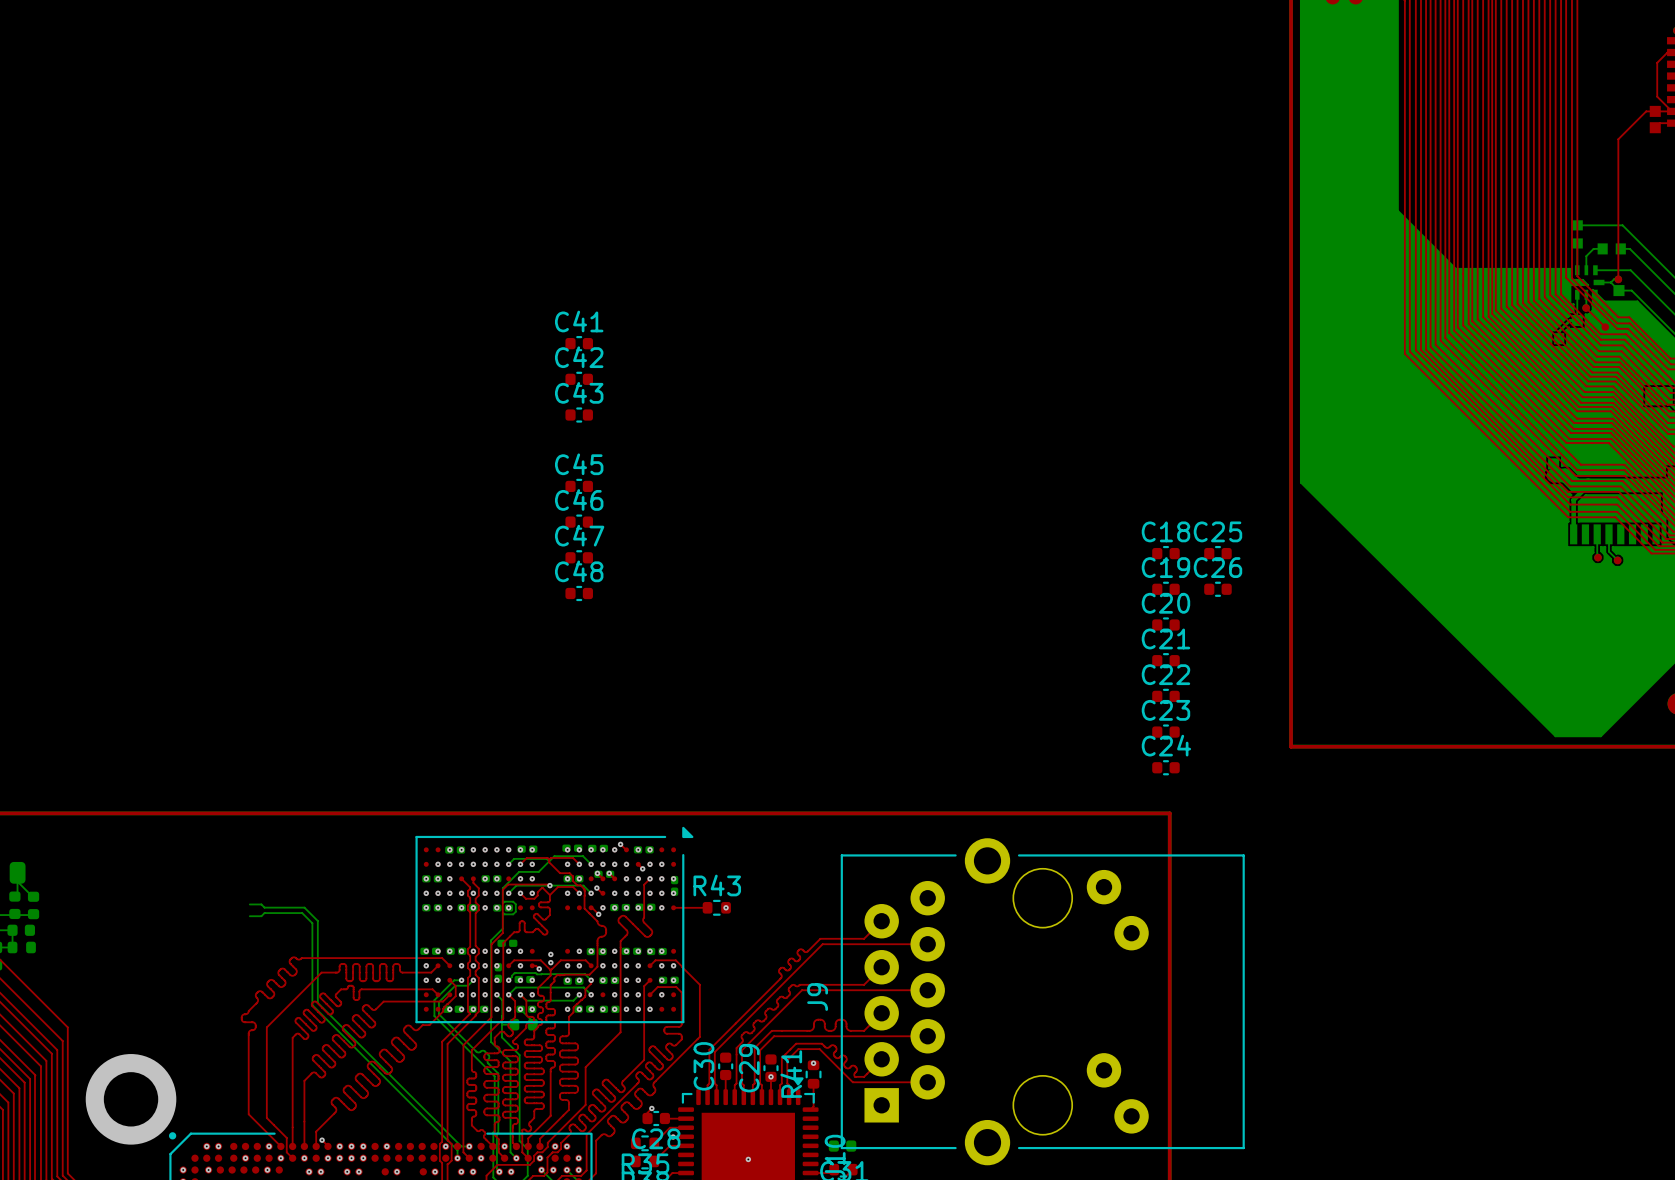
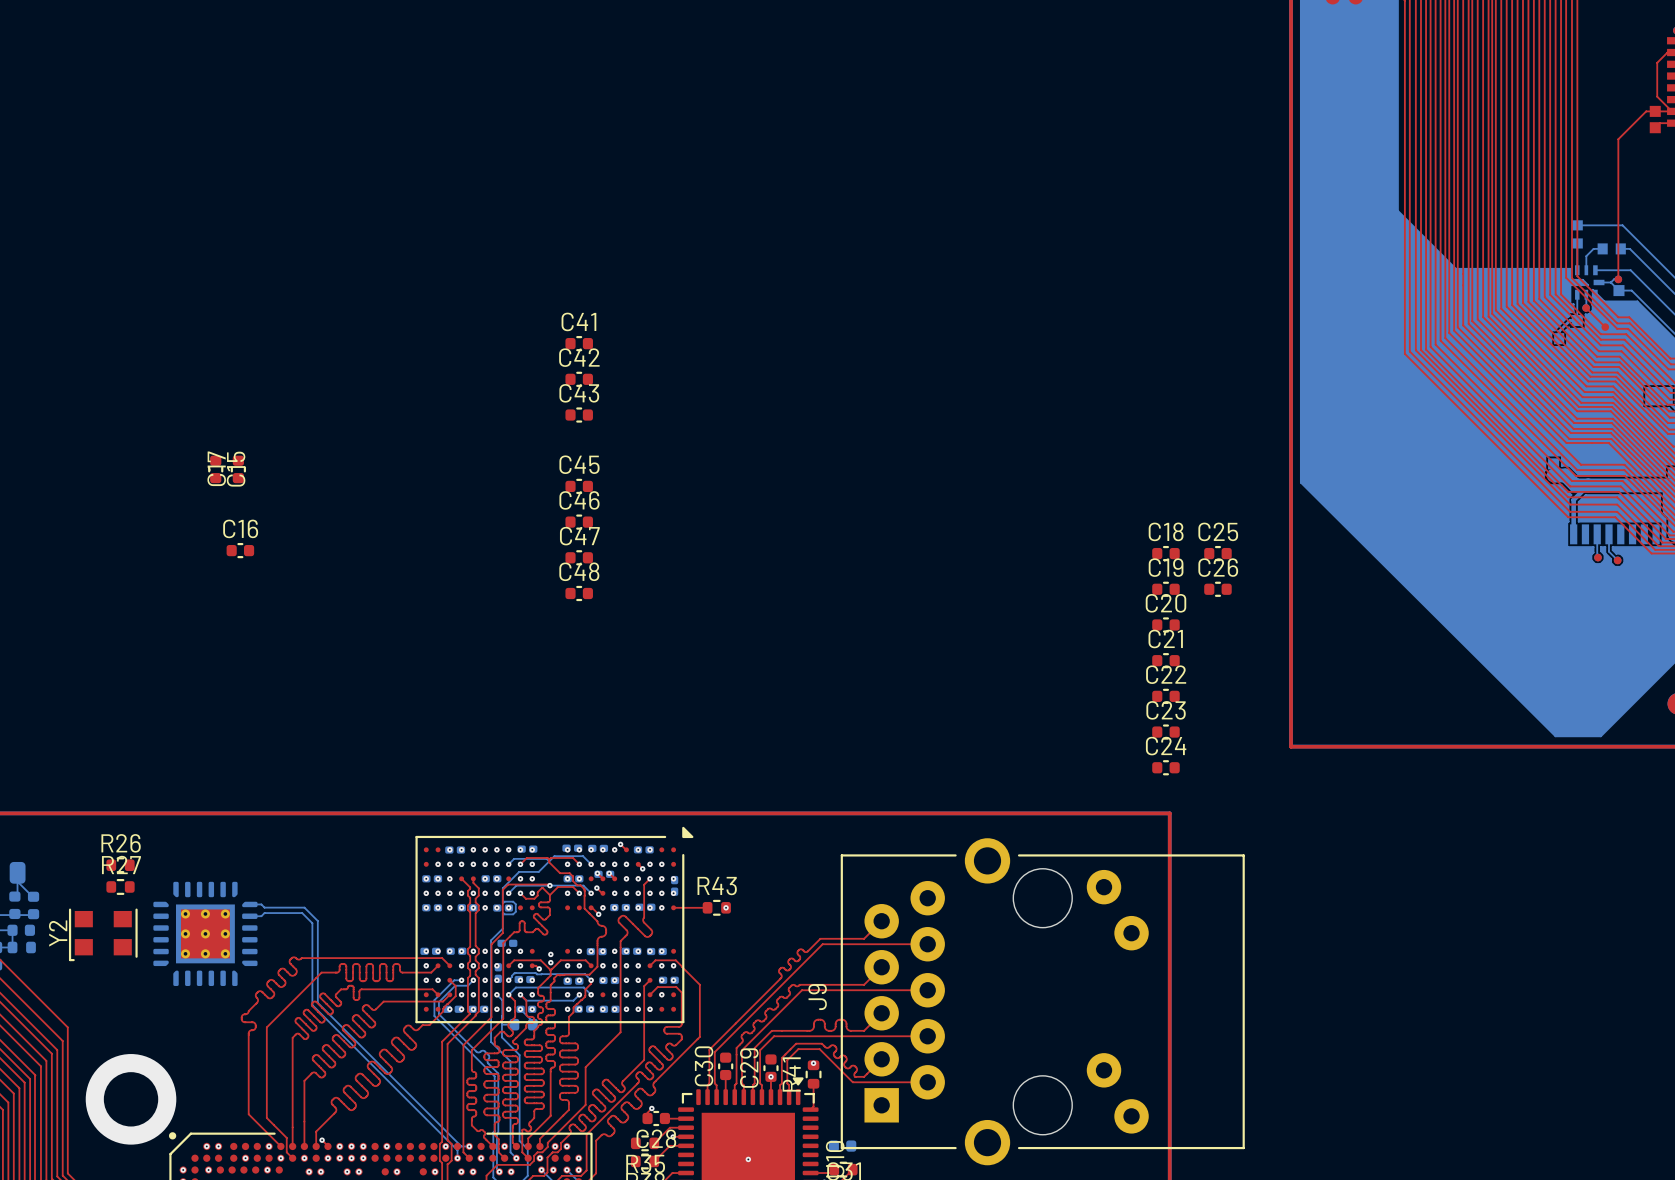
C15: none -> (215, 469)
C17: none -> (238, 469)
C16: none -> (240, 550)
R26: none -> (120, 865)
R27: none -> (120, 886)
part: none -> (205, 933)
Y2: none -> (103, 934)

